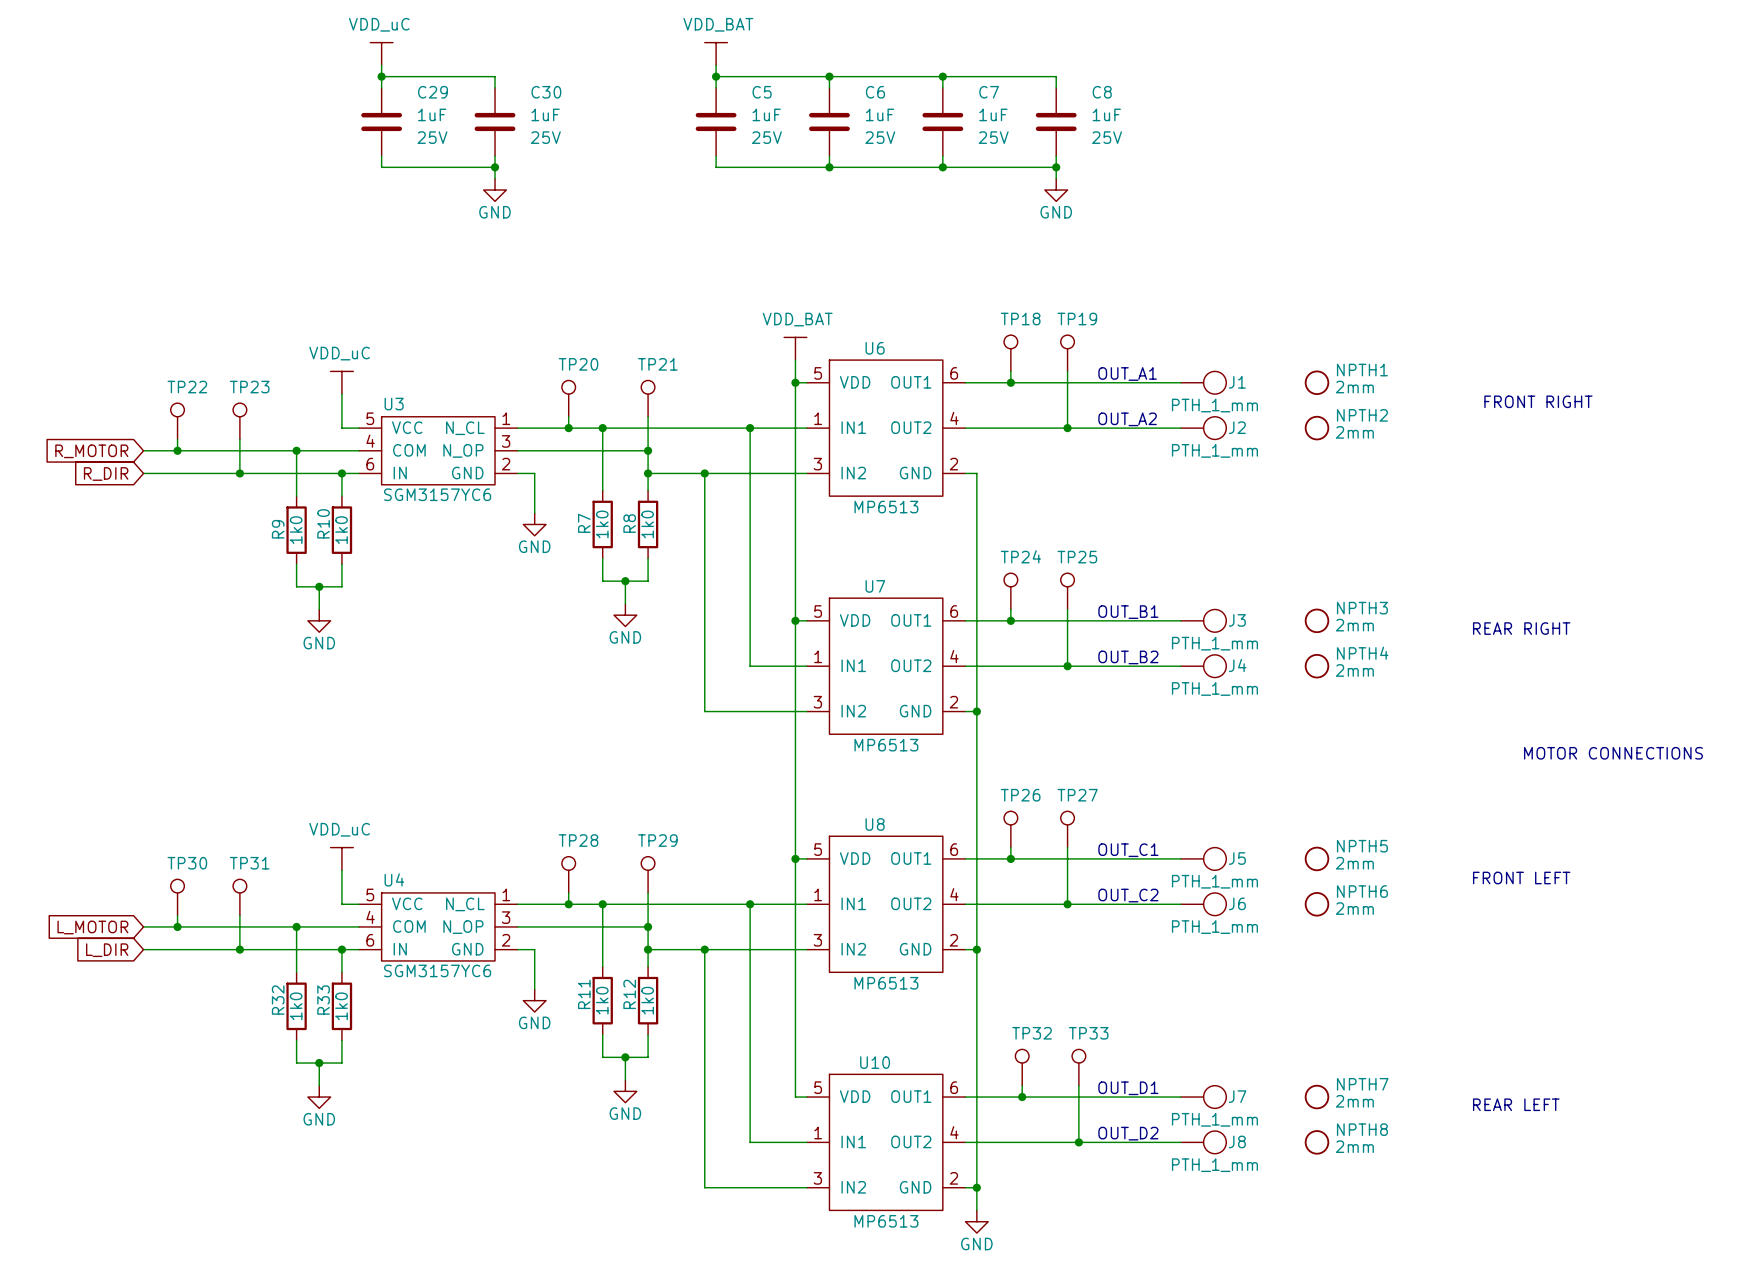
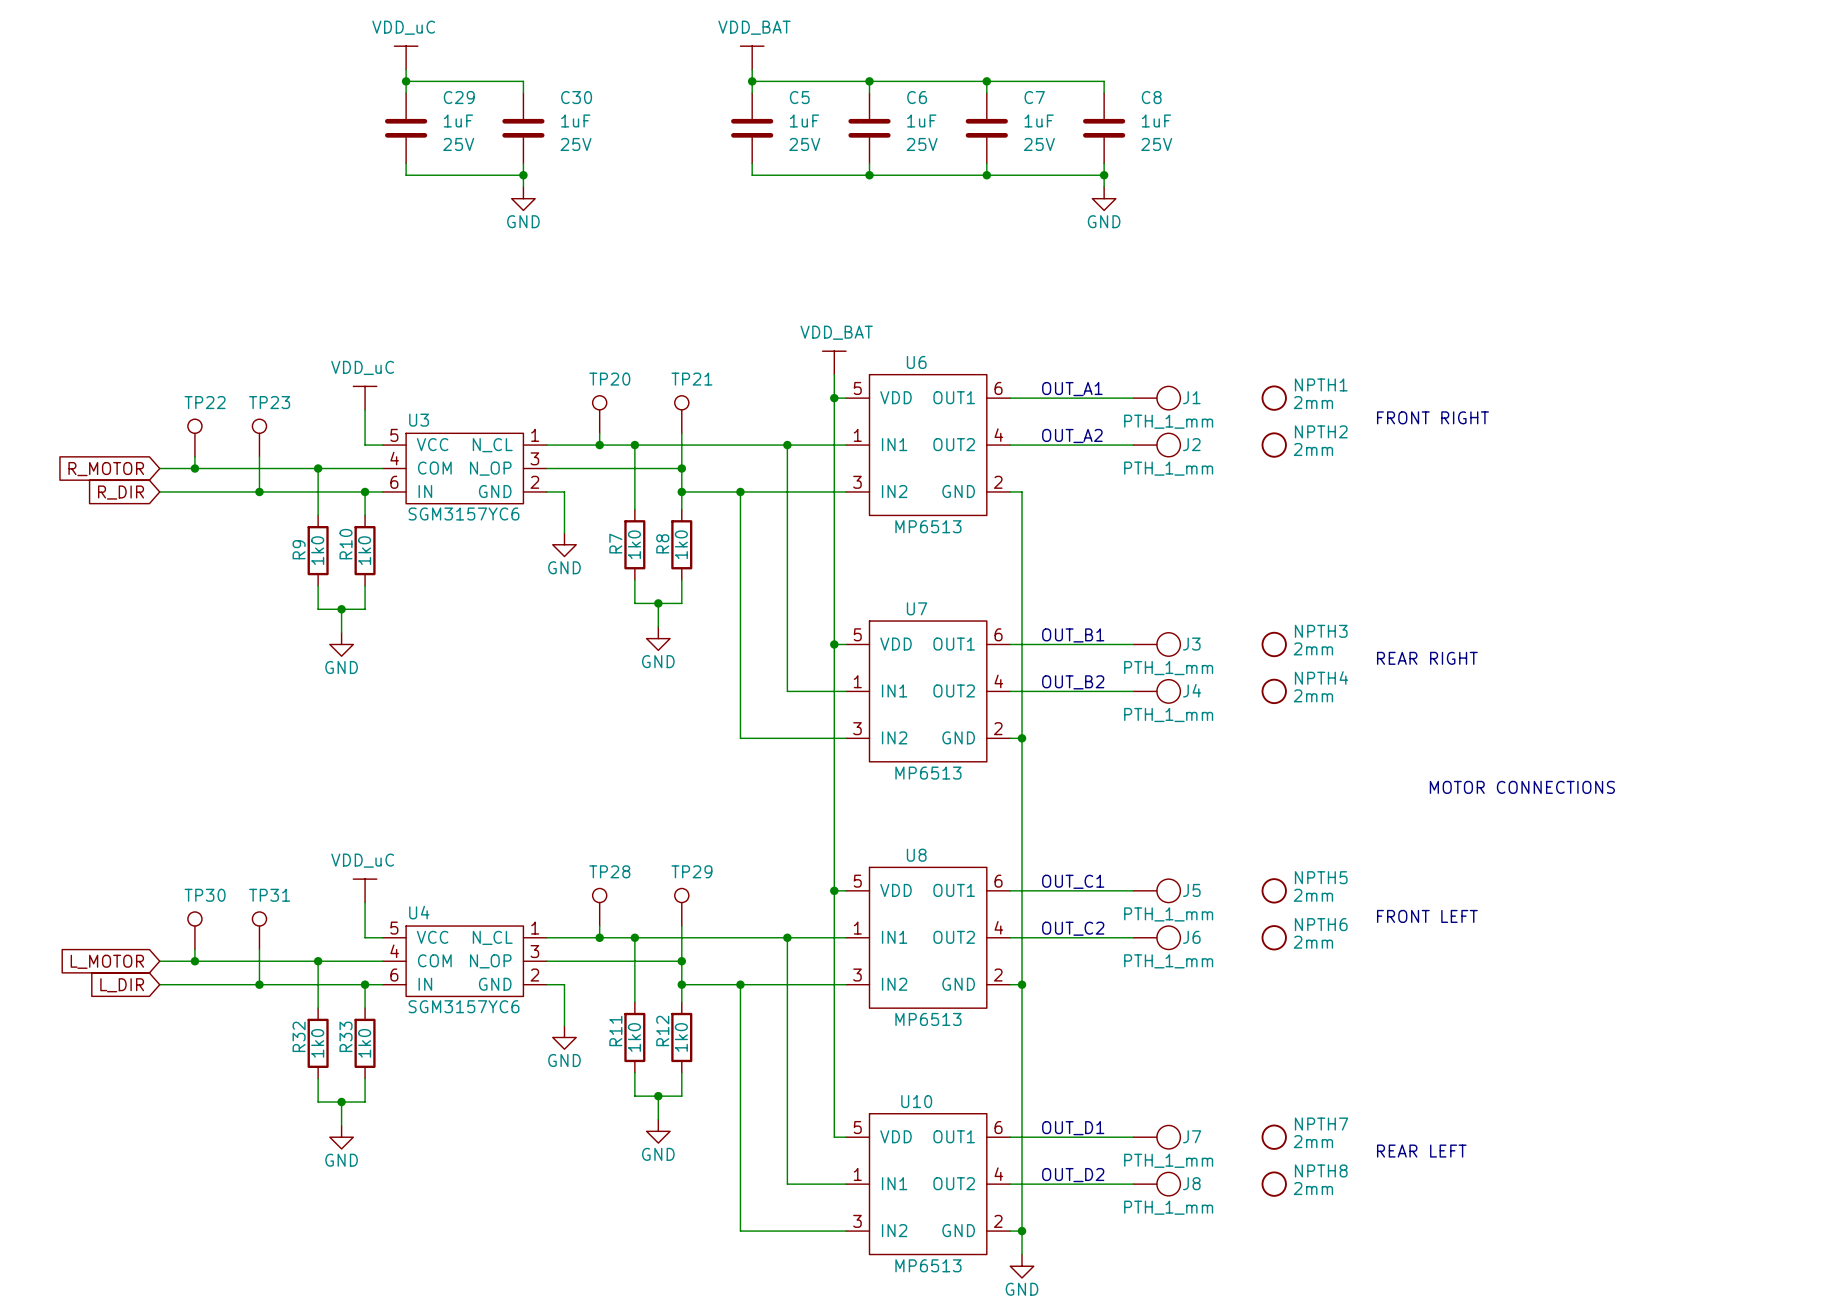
TP18: (1010, 353) -> none
TP19: (1067, 353) -> none
wire: (1010, 371) (1010, 382) -> none
wire: (1067, 371) (1067, 428) -> none
text position: OUT_A1 (1127, 374) -> OUT_A1 (1072, 389)
junction: (1010, 382) -> none
wire: (1084, 382) (1180, 382) -> none
J1 position: (1203, 382) -> (1156, 398)
NPTH1 position: (1316, 382) -> (1274, 398)
text position: FRONT RIGHT (1538, 401) -> FRONT RIGHT (1432, 417)
text position: OUT_A2 (1127, 419) -> OUT_A2 (1072, 436)
junction: (1067, 428) -> none
wire: (1084, 428) (1180, 428) -> none
J2 position: (1203, 428) -> (1156, 445)
NPTH2 position: (1316, 428) -> (1274, 445)
TP24: (1010, 591) -> none
TP25: (1067, 591) -> none
wire: (1010, 609) (1010, 620) -> none
wire: (1067, 609) (1067, 666) -> none
text position: OUT_B1 (1128, 612) -> OUT_B1 (1073, 635)
junction: (1010, 620) -> none
wire: (1084, 620) (1180, 620) -> none
J3 position: (1203, 620) -> (1156, 644)
NPTH3 position: (1316, 620) -> (1274, 644)
text position: REAR RIGHT (1521, 628) -> REAR RIGHT (1427, 658)
text position: OUT_B2 (1128, 657) -> OUT_B2 (1073, 682)
junction: (1067, 666) -> none
wire: (1084, 666) (1180, 666) -> none
J4 position: (1203, 666) -> (1156, 691)
NPTH4 position: (1316, 666) -> (1274, 691)
text position: MOTOR CONNECTIONS (1613, 753) -> MOTOR CONNECTIONS (1522, 787)
TP26: (1010, 829) -> none
TP27: (1067, 829) -> none
wire: (1010, 847) (1010, 858) -> none
wire: (1067, 847) (1067, 904) -> none
text position: OUT_C1 (1128, 850) -> OUT_C1 (1073, 881)
junction: (1010, 858) -> none
wire: (1084, 858) (1180, 858) -> none
J5 position: (1203, 858) -> (1156, 890)
NPTH5 position: (1316, 858) -> (1274, 890)
text position: FRONT LEFT (1521, 877) -> FRONT LEFT (1427, 916)
text position: OUT_C2 (1128, 895) -> OUT_C2 (1073, 928)
junction: (1067, 904) -> none
wire: (1084, 904) (1180, 904) -> none
J6 position: (1203, 904) -> (1156, 937)
NPTH6 position: (1316, 904) -> (1274, 937)
TP32: (1022, 1067) -> none
TP33: (1078, 1067) -> none
wire: (1022, 1085) (1022, 1097) -> none
wire: (1078, 1085) (1078, 1142) -> none
text position: OUT_D1 (1128, 1088) -> OUT_D1 (1073, 1128)
junction: (1022, 1097) -> none
wire: (1084, 1097) (1180, 1097) -> none
J7 position: (1203, 1097) -> (1156, 1137)
NPTH7 position: (1316, 1097) -> (1274, 1137)
text position: REAR LEFT (1516, 1104) -> REAR LEFT (1421, 1151)
text position: OUT_D2 (1128, 1133) -> OUT_D2 (1073, 1175)
junction: (1078, 1142) -> none
wire: (1084, 1142) (1180, 1142) -> none
J8 position: (1203, 1142) -> (1156, 1184)
NPTH8 position: (1316, 1142) -> (1274, 1184)

